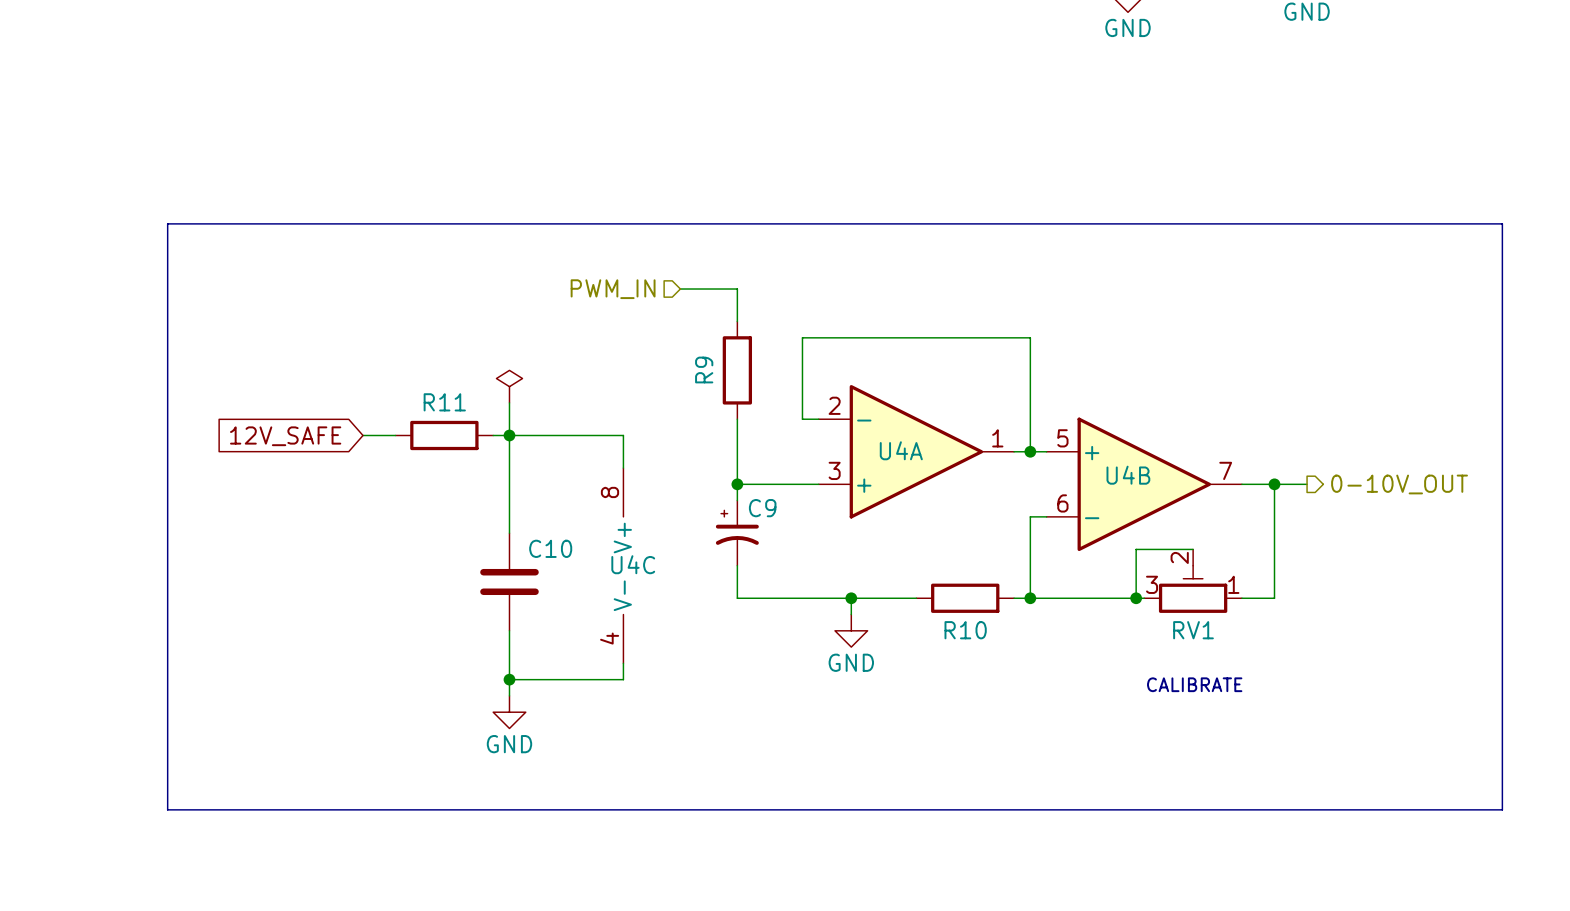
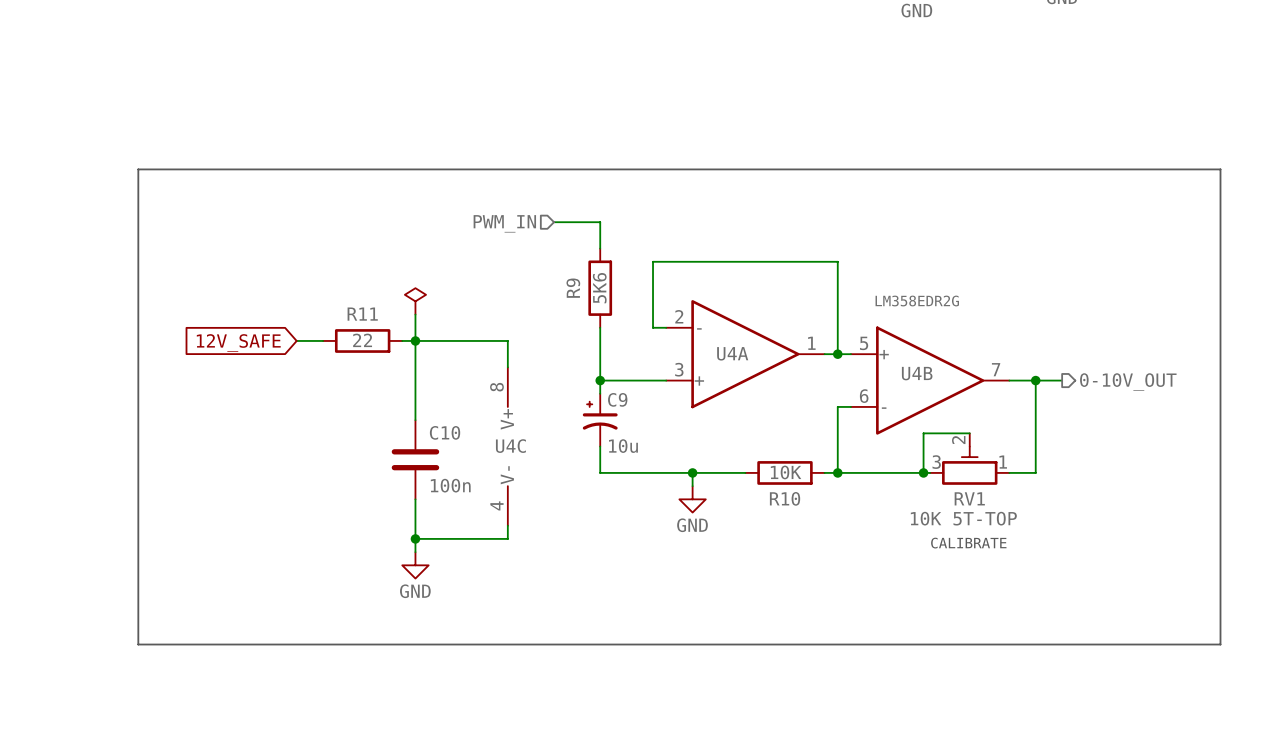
R9 value: none -> 5K6 (599, 288)
U4B value: none -> LM358EDR2G (917, 301)
R11 value: none -> 22 (362, 340)
C9 value: none -> 10u (623, 446)
R10 value: none -> 10K (786, 472)
C10 value: none -> 100n (450, 485)
RV1 value: none -> 10K 5T-TOP (963, 518)

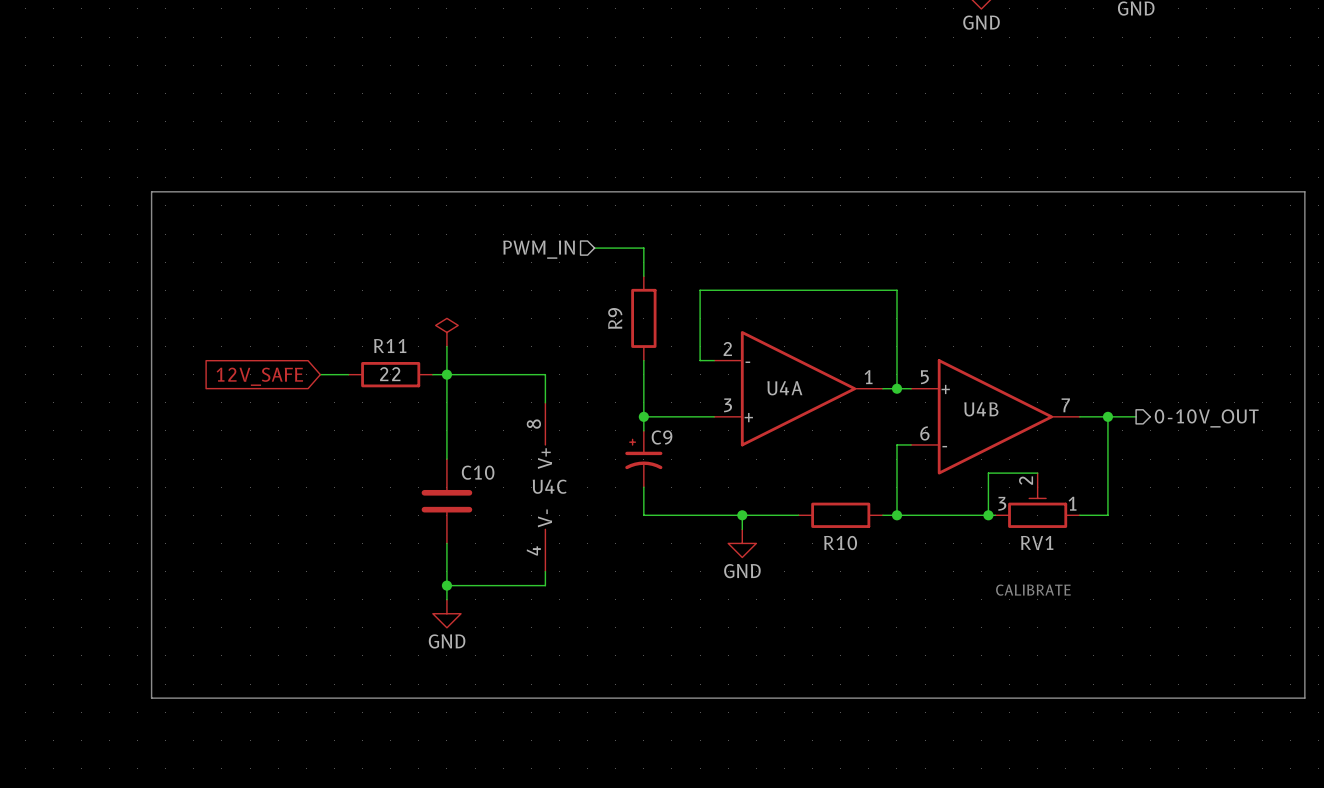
R9 value: 5K6 (599, 288) -> none
U4B value: LM358EDR2G (917, 301) -> none
C9 value: 10u (623, 446) -> none
R10 value: 10K (786, 472) -> none
C10 value: 100n (450, 485) -> none
RV1 value: 10K 5T-TOP (963, 518) -> none

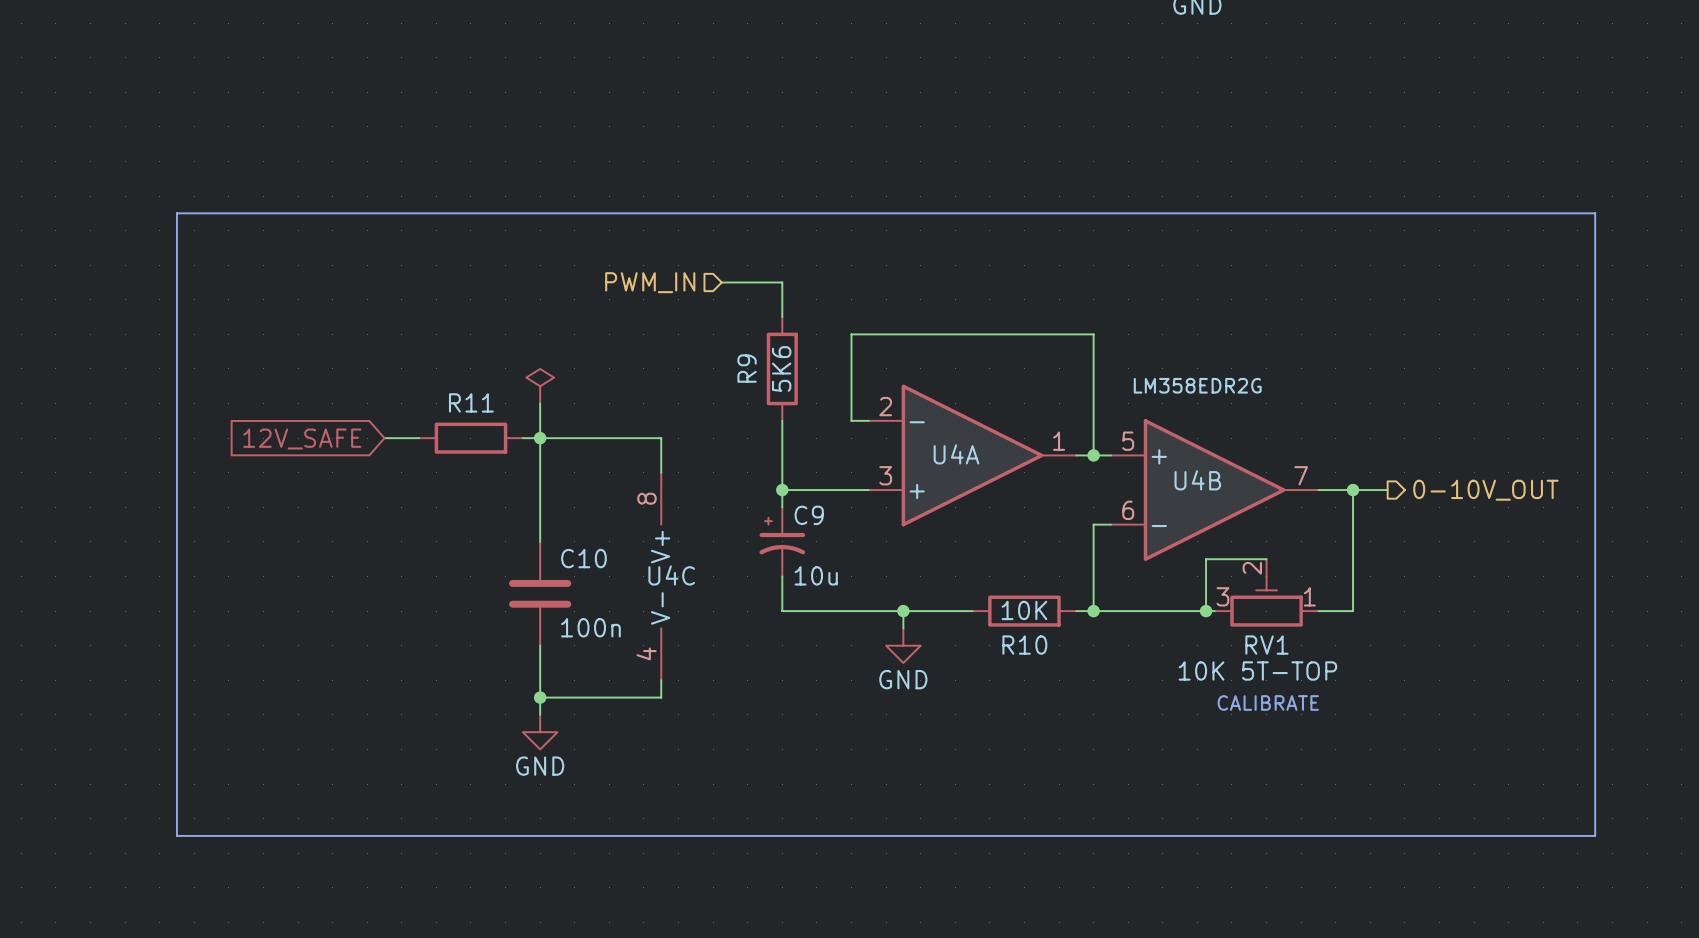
R9 value: none -> 5K6 (781, 368)
U4B value: none -> LM358EDR2G (1197, 385)
R11 value: 22 (390, 374) -> none
C9 value: none -> 10u (816, 575)
R10 value: none -> 10K (1024, 610)
C10 value: none -> 100n (590, 627)
RV1 value: none -> 10K 5T-TOP (1257, 670)

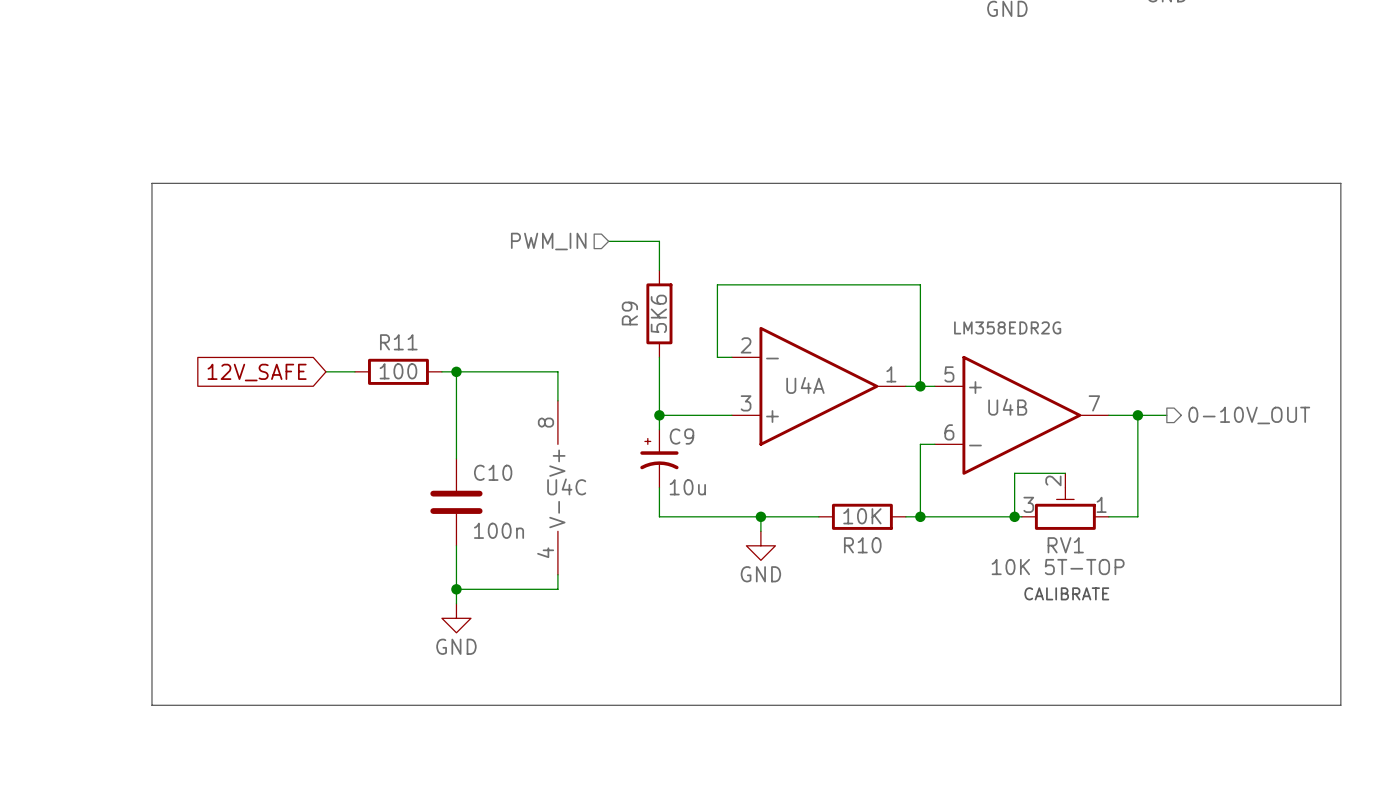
power symbol: (540, 386) -> none
wire: (540, 403) (540, 438) -> none
R11 value: none -> 100 (398, 371)

